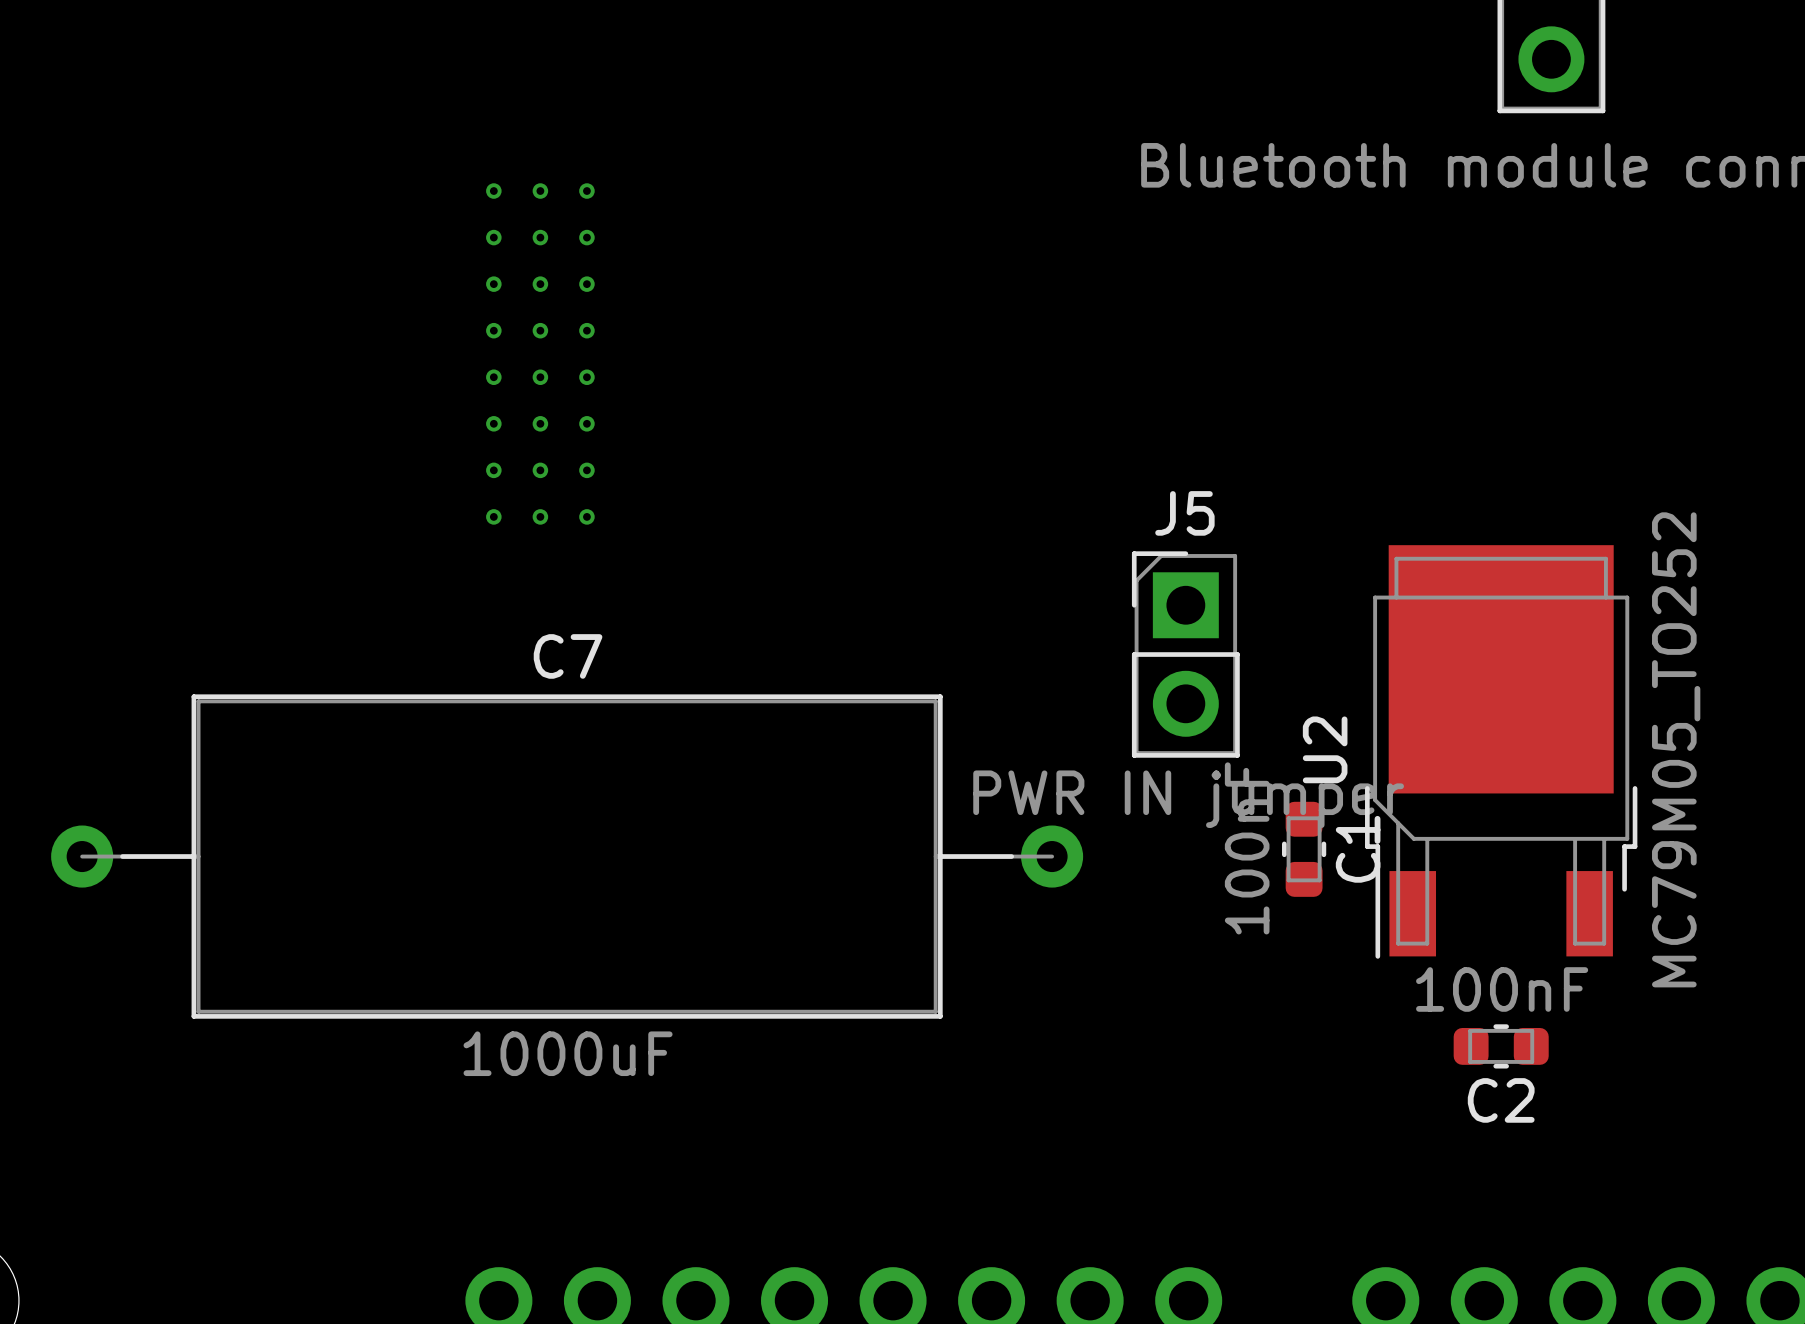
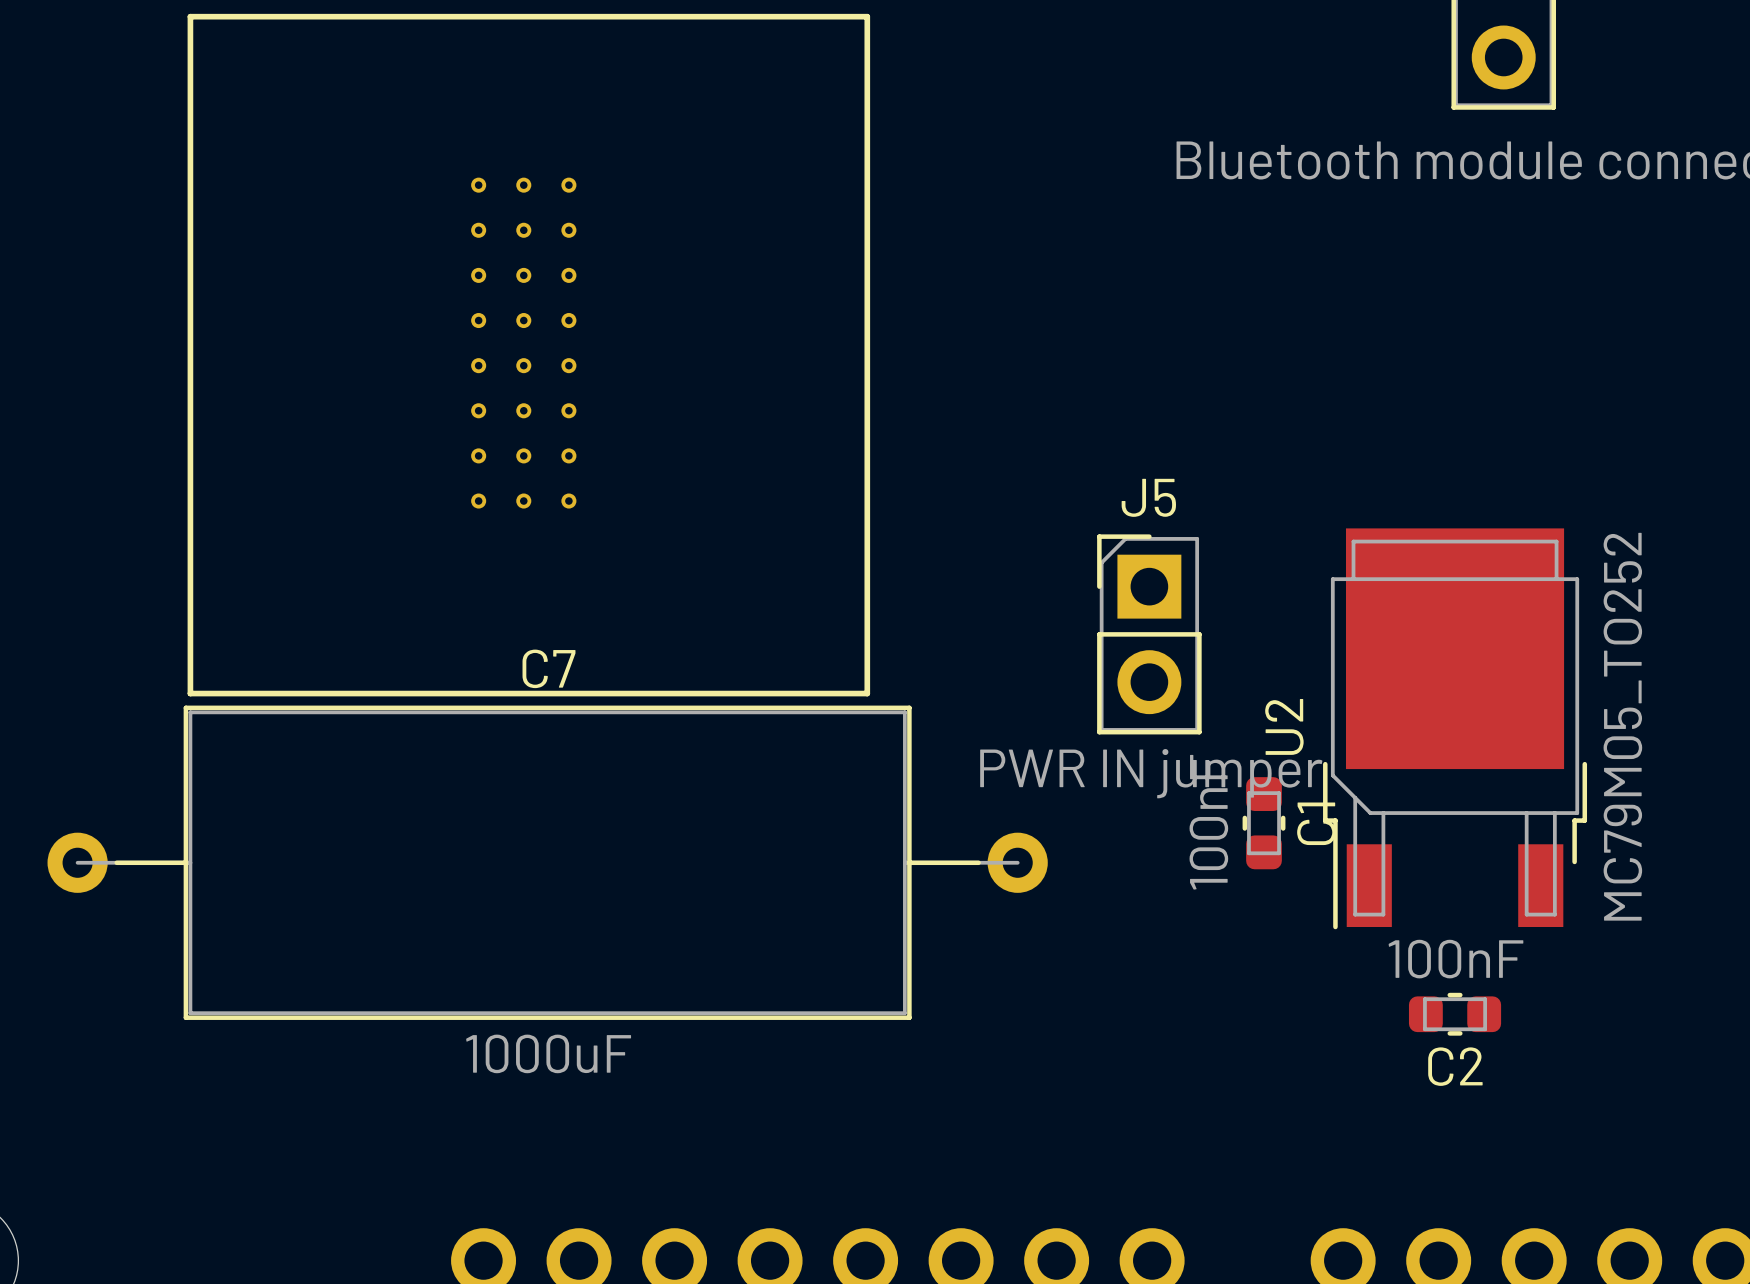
line: none -> (190, 16) (867, 16) (867, 693) (190, 693) (190, 16)
C7 position: (567, 856) -> (547, 862)

